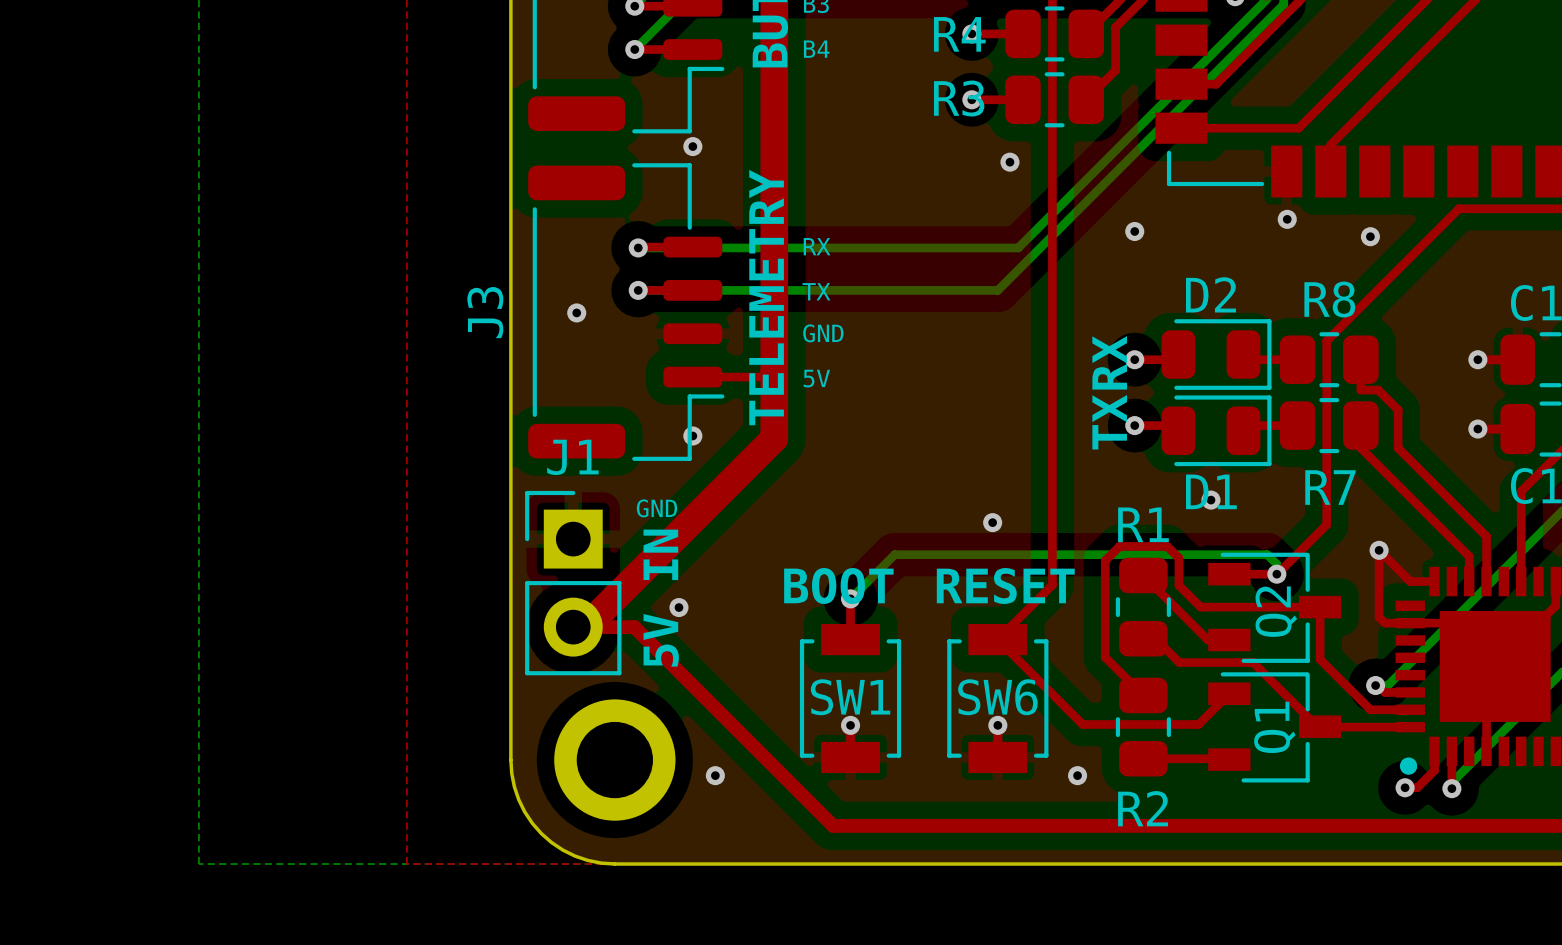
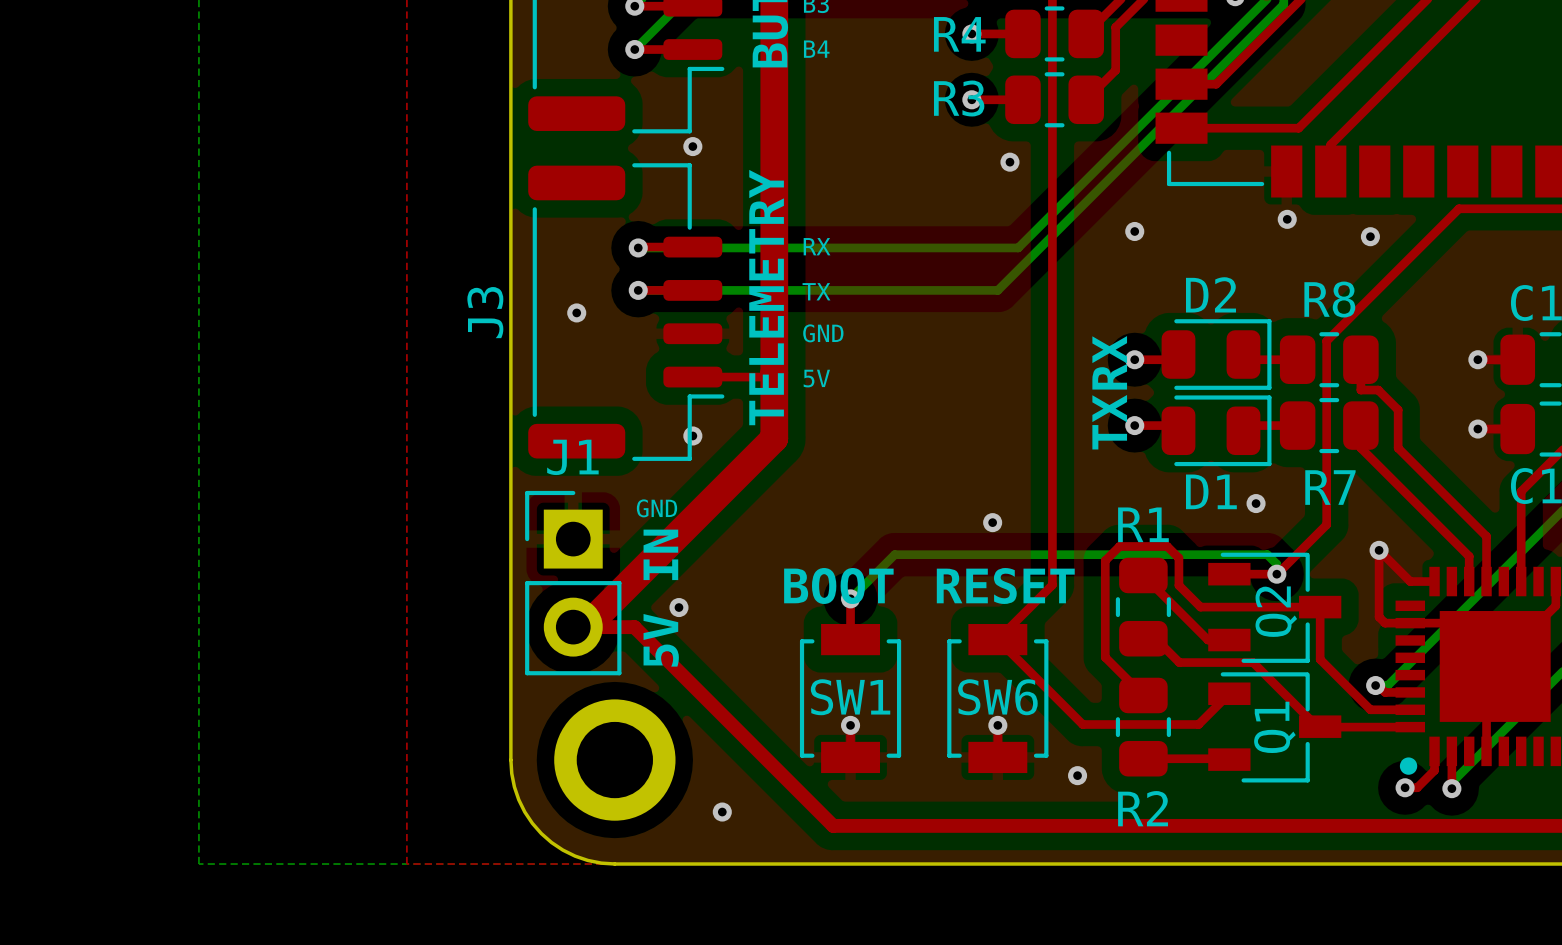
via position: (1210, 500) -> (1256, 503)
via position: (715, 775) -> (722, 812)

